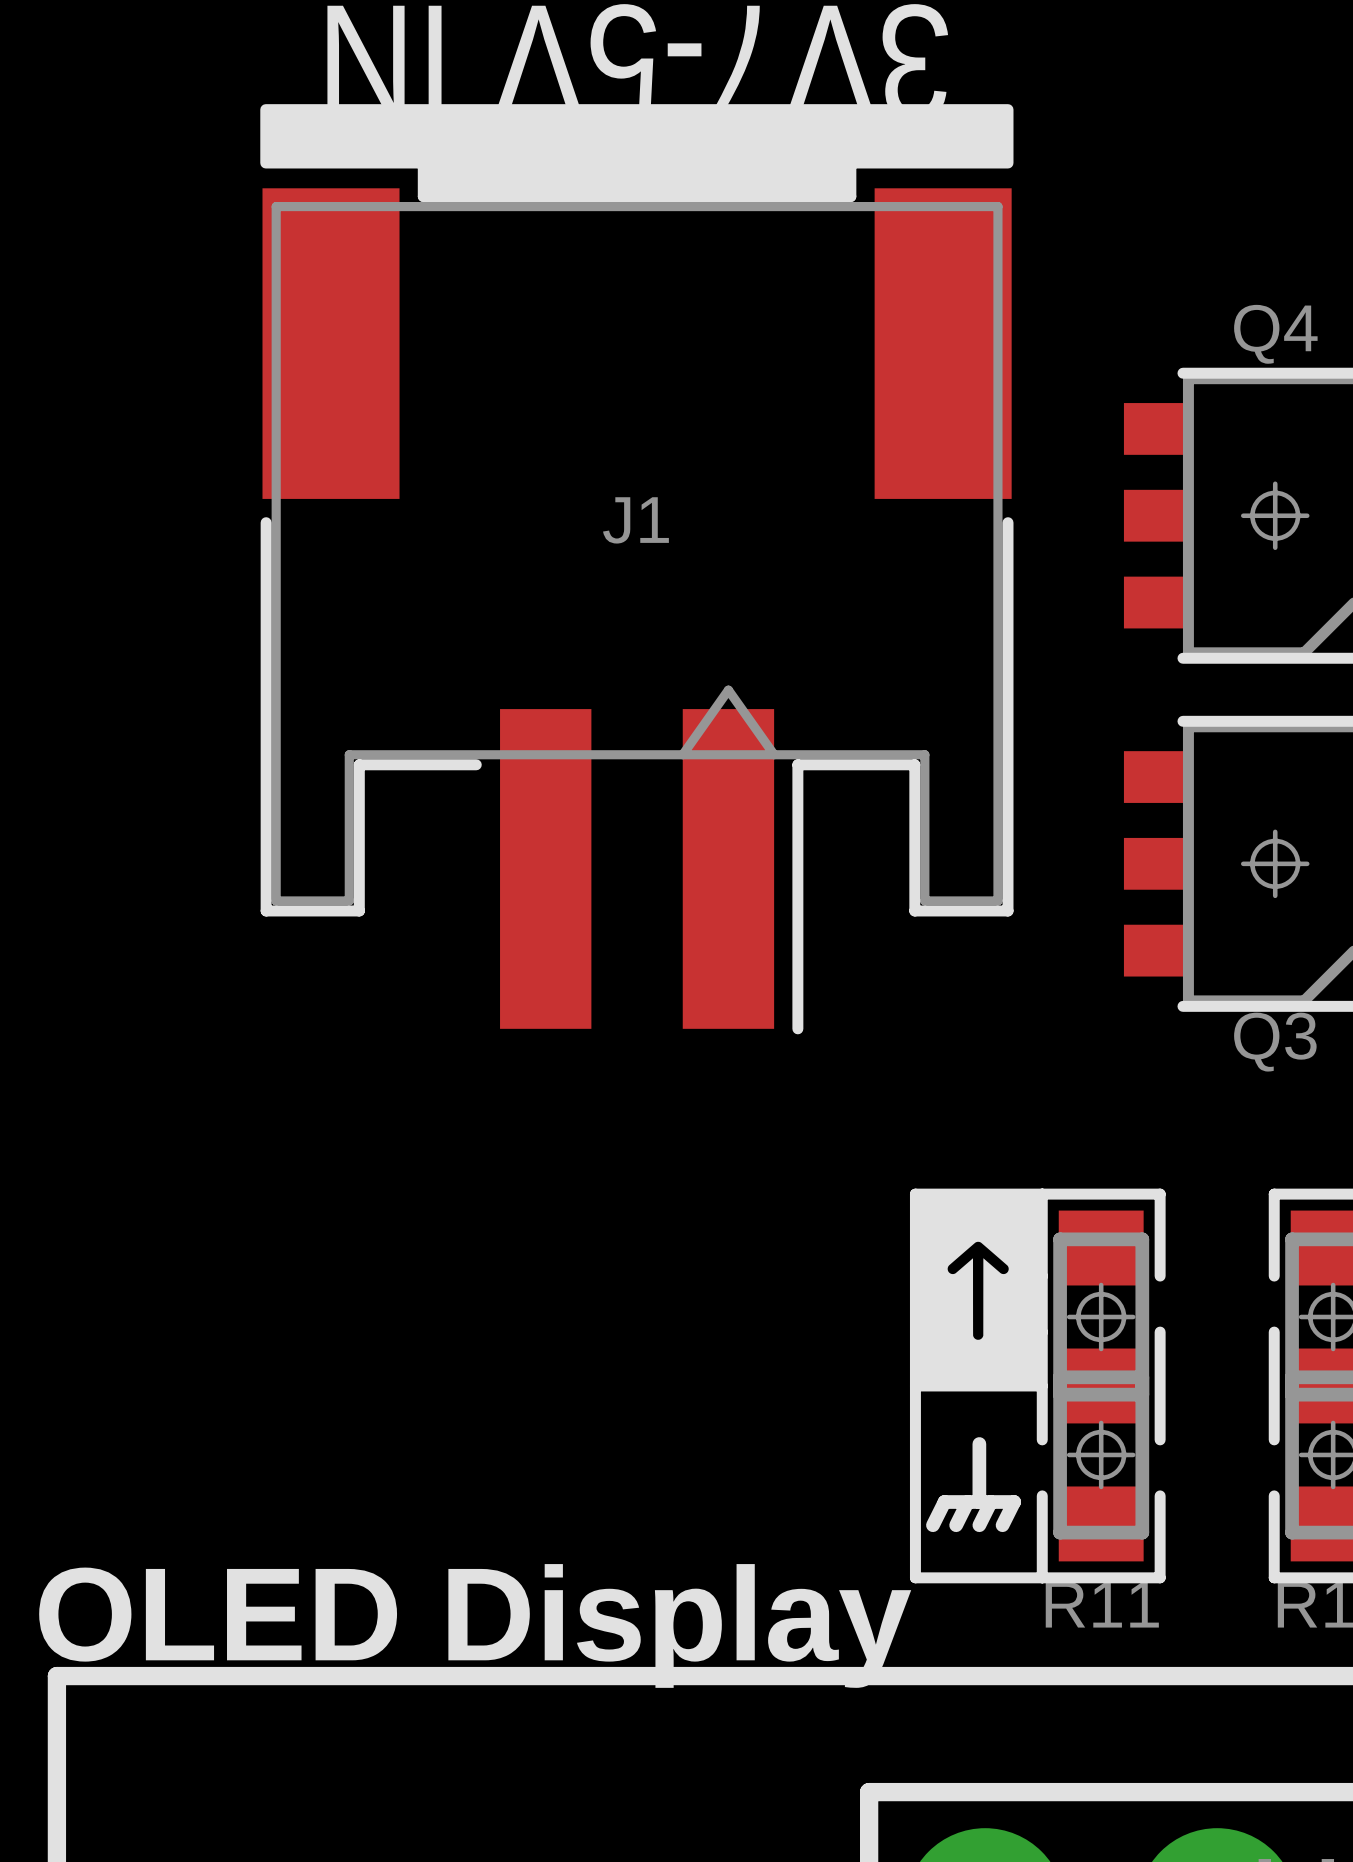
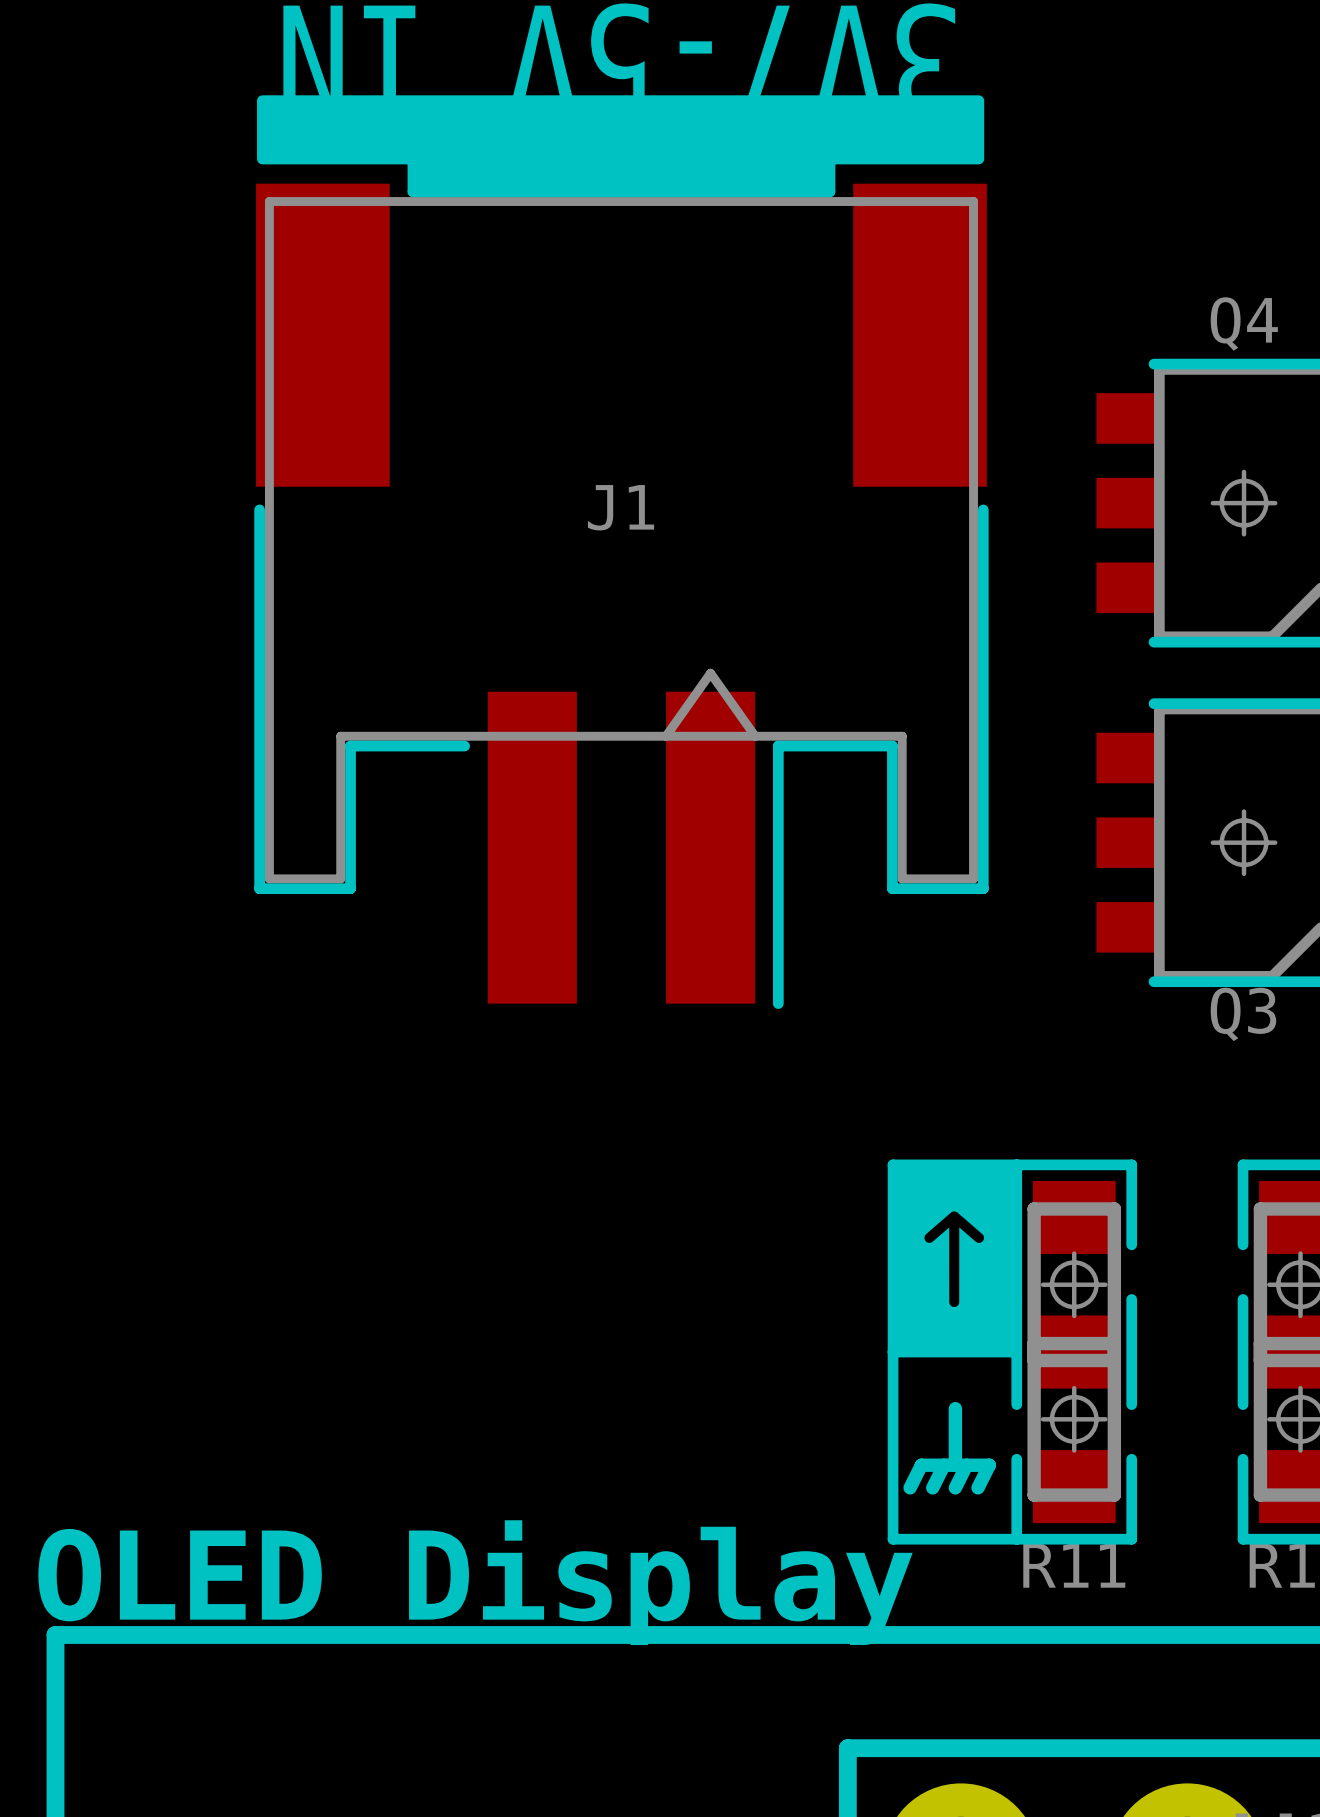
drawing shape: [260, 104, 1014, 169] -> [257, 95, 985, 165]

